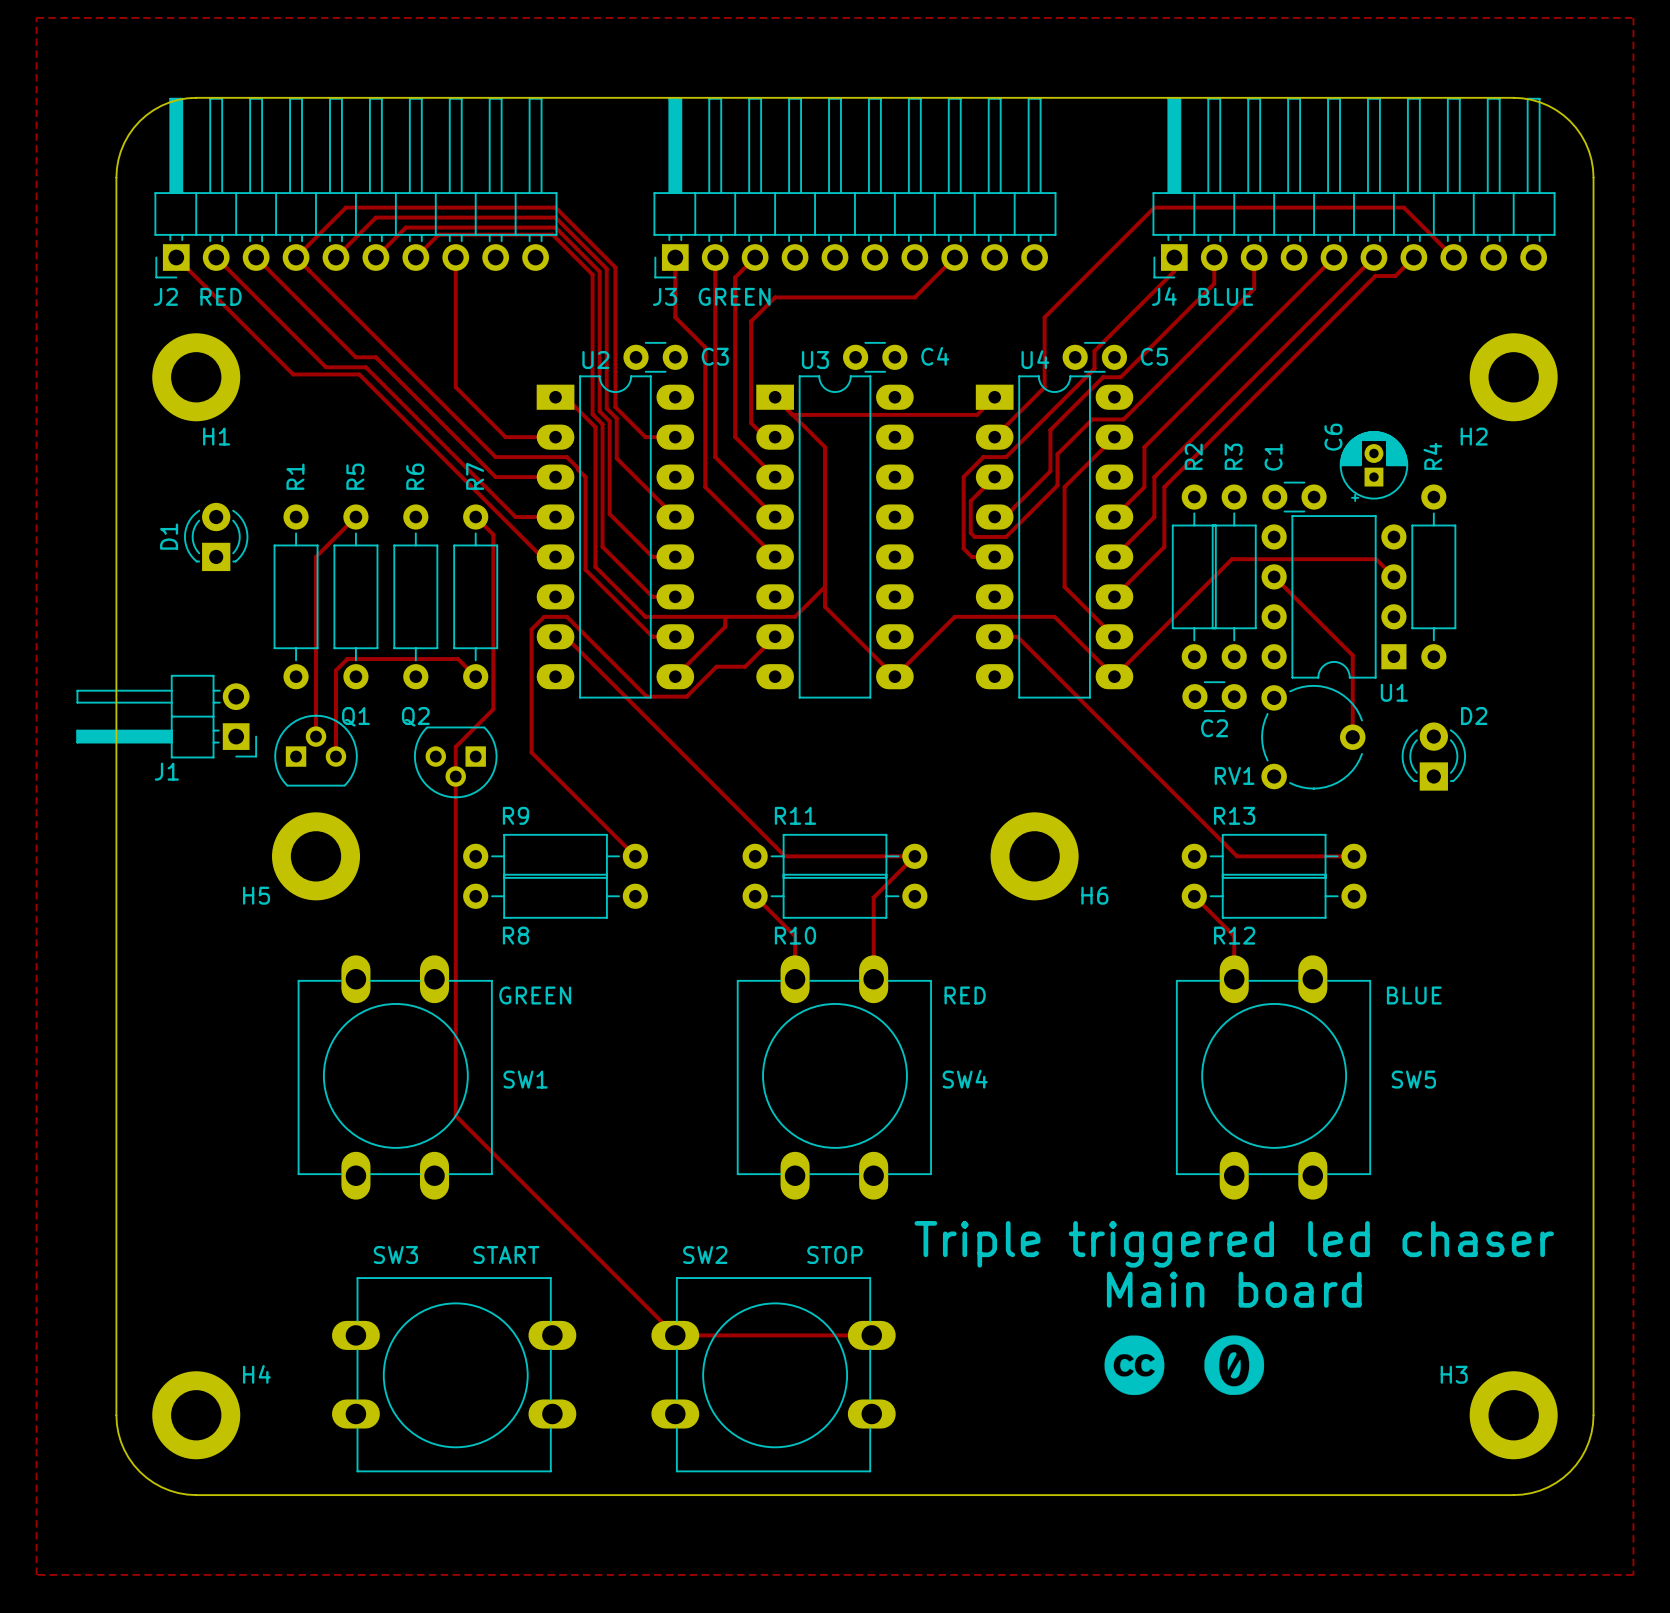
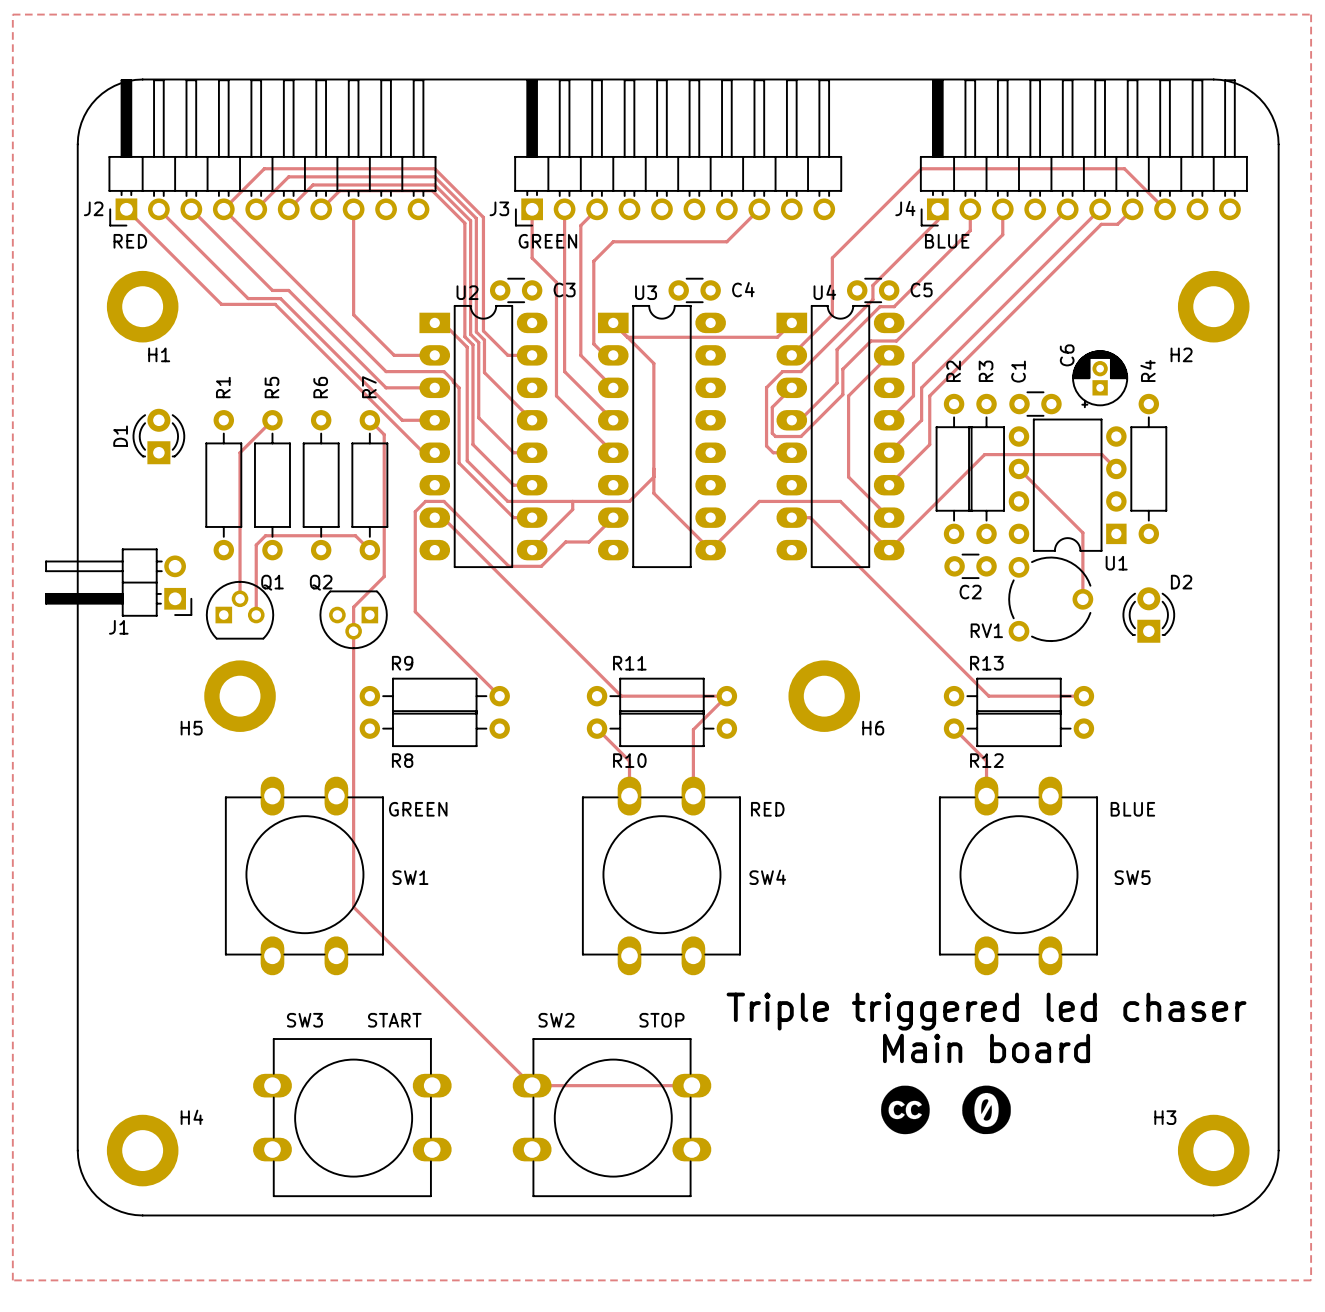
J2 name position: J2 (165, 296) -> J2 (93, 208)
text position: RED (220, 296) -> RED (130, 241)
J3 name position: J3 (664, 296) -> J3 (499, 208)
text position: GREEN (734, 296) -> GREEN (547, 241)
J4 name position: J4 (1164, 296) -> J4 (905, 208)
text position: BLUE (1225, 296) -> BLUE (947, 241)

